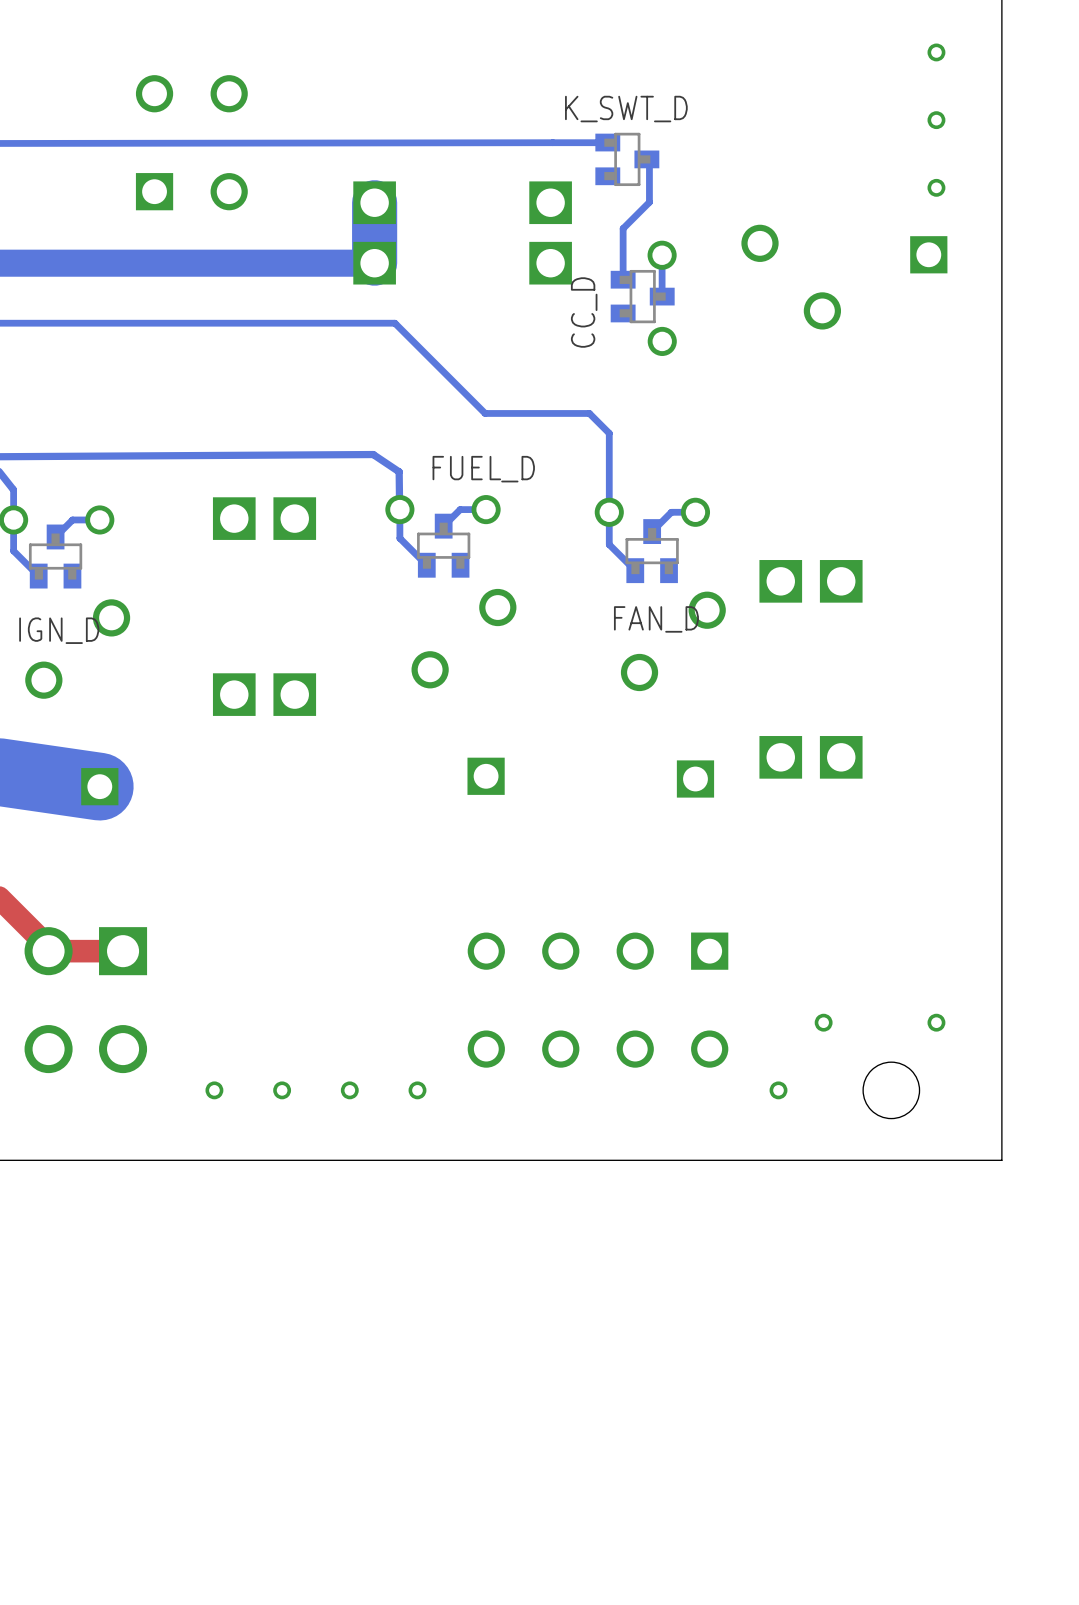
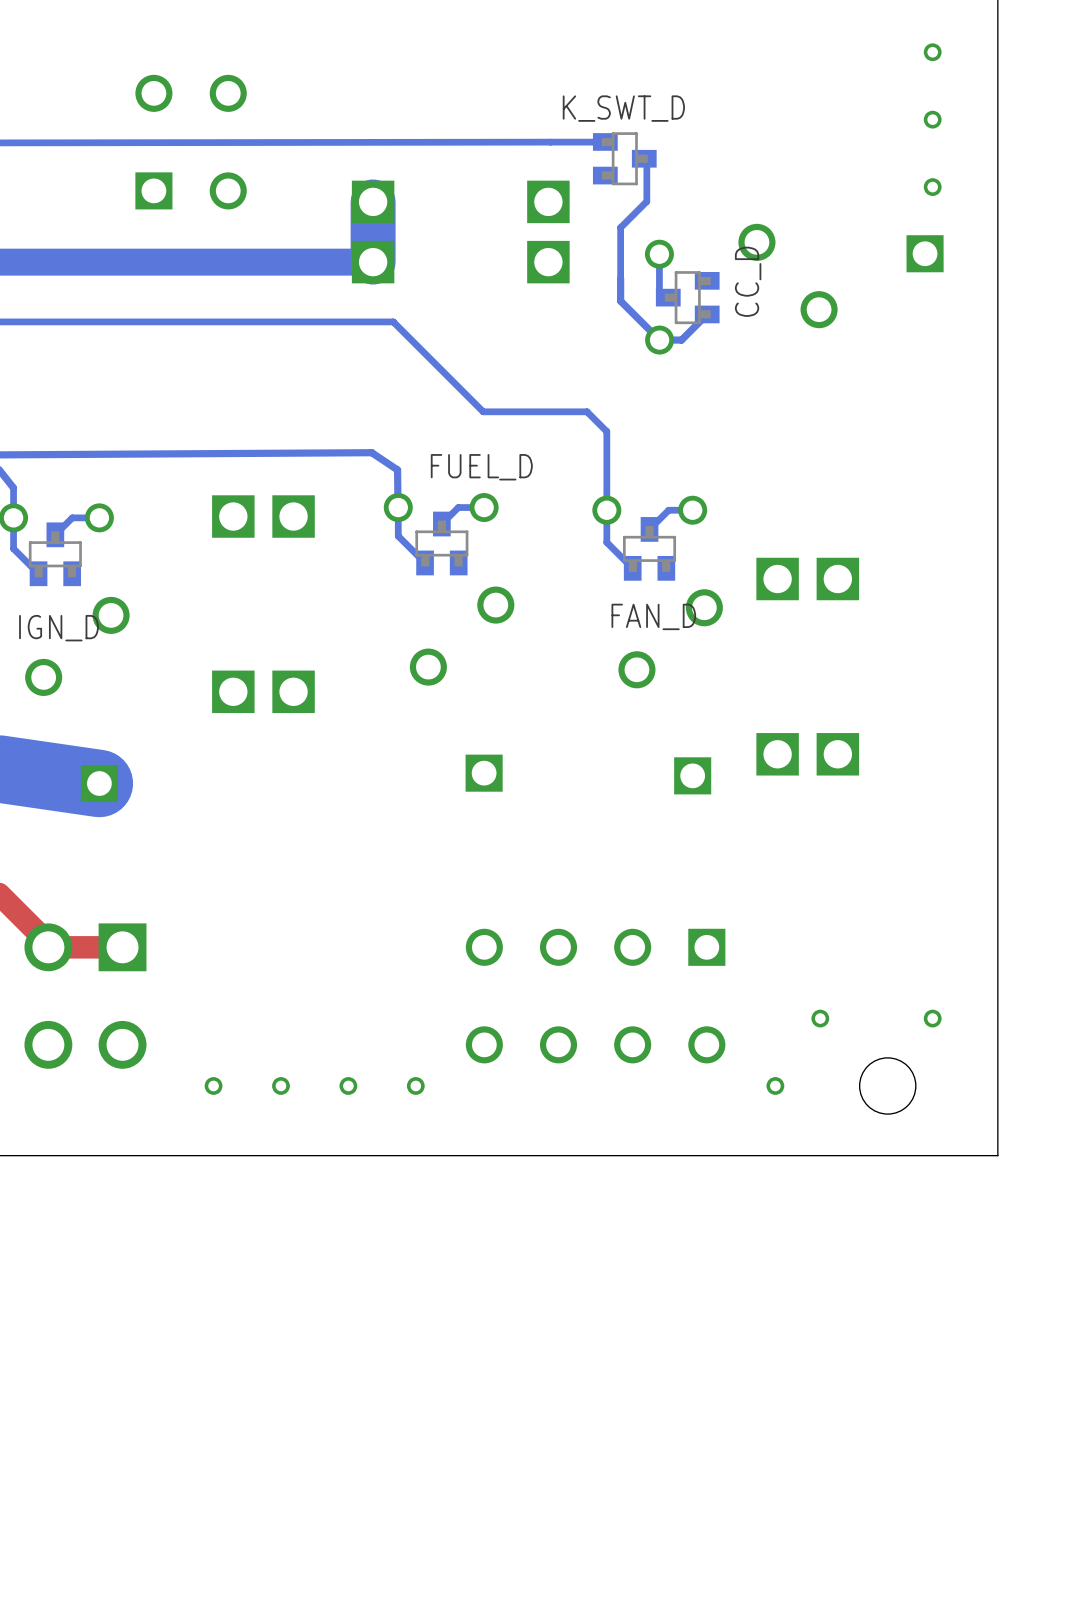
bottom track: none -> (620, 278) (620, 301) (659, 340) (681, 340) (707, 314)
CC_D rotation: 0° (642, 296) -> 180° (687, 297)
CC_D position: (642, 296) -> (687, 297)

